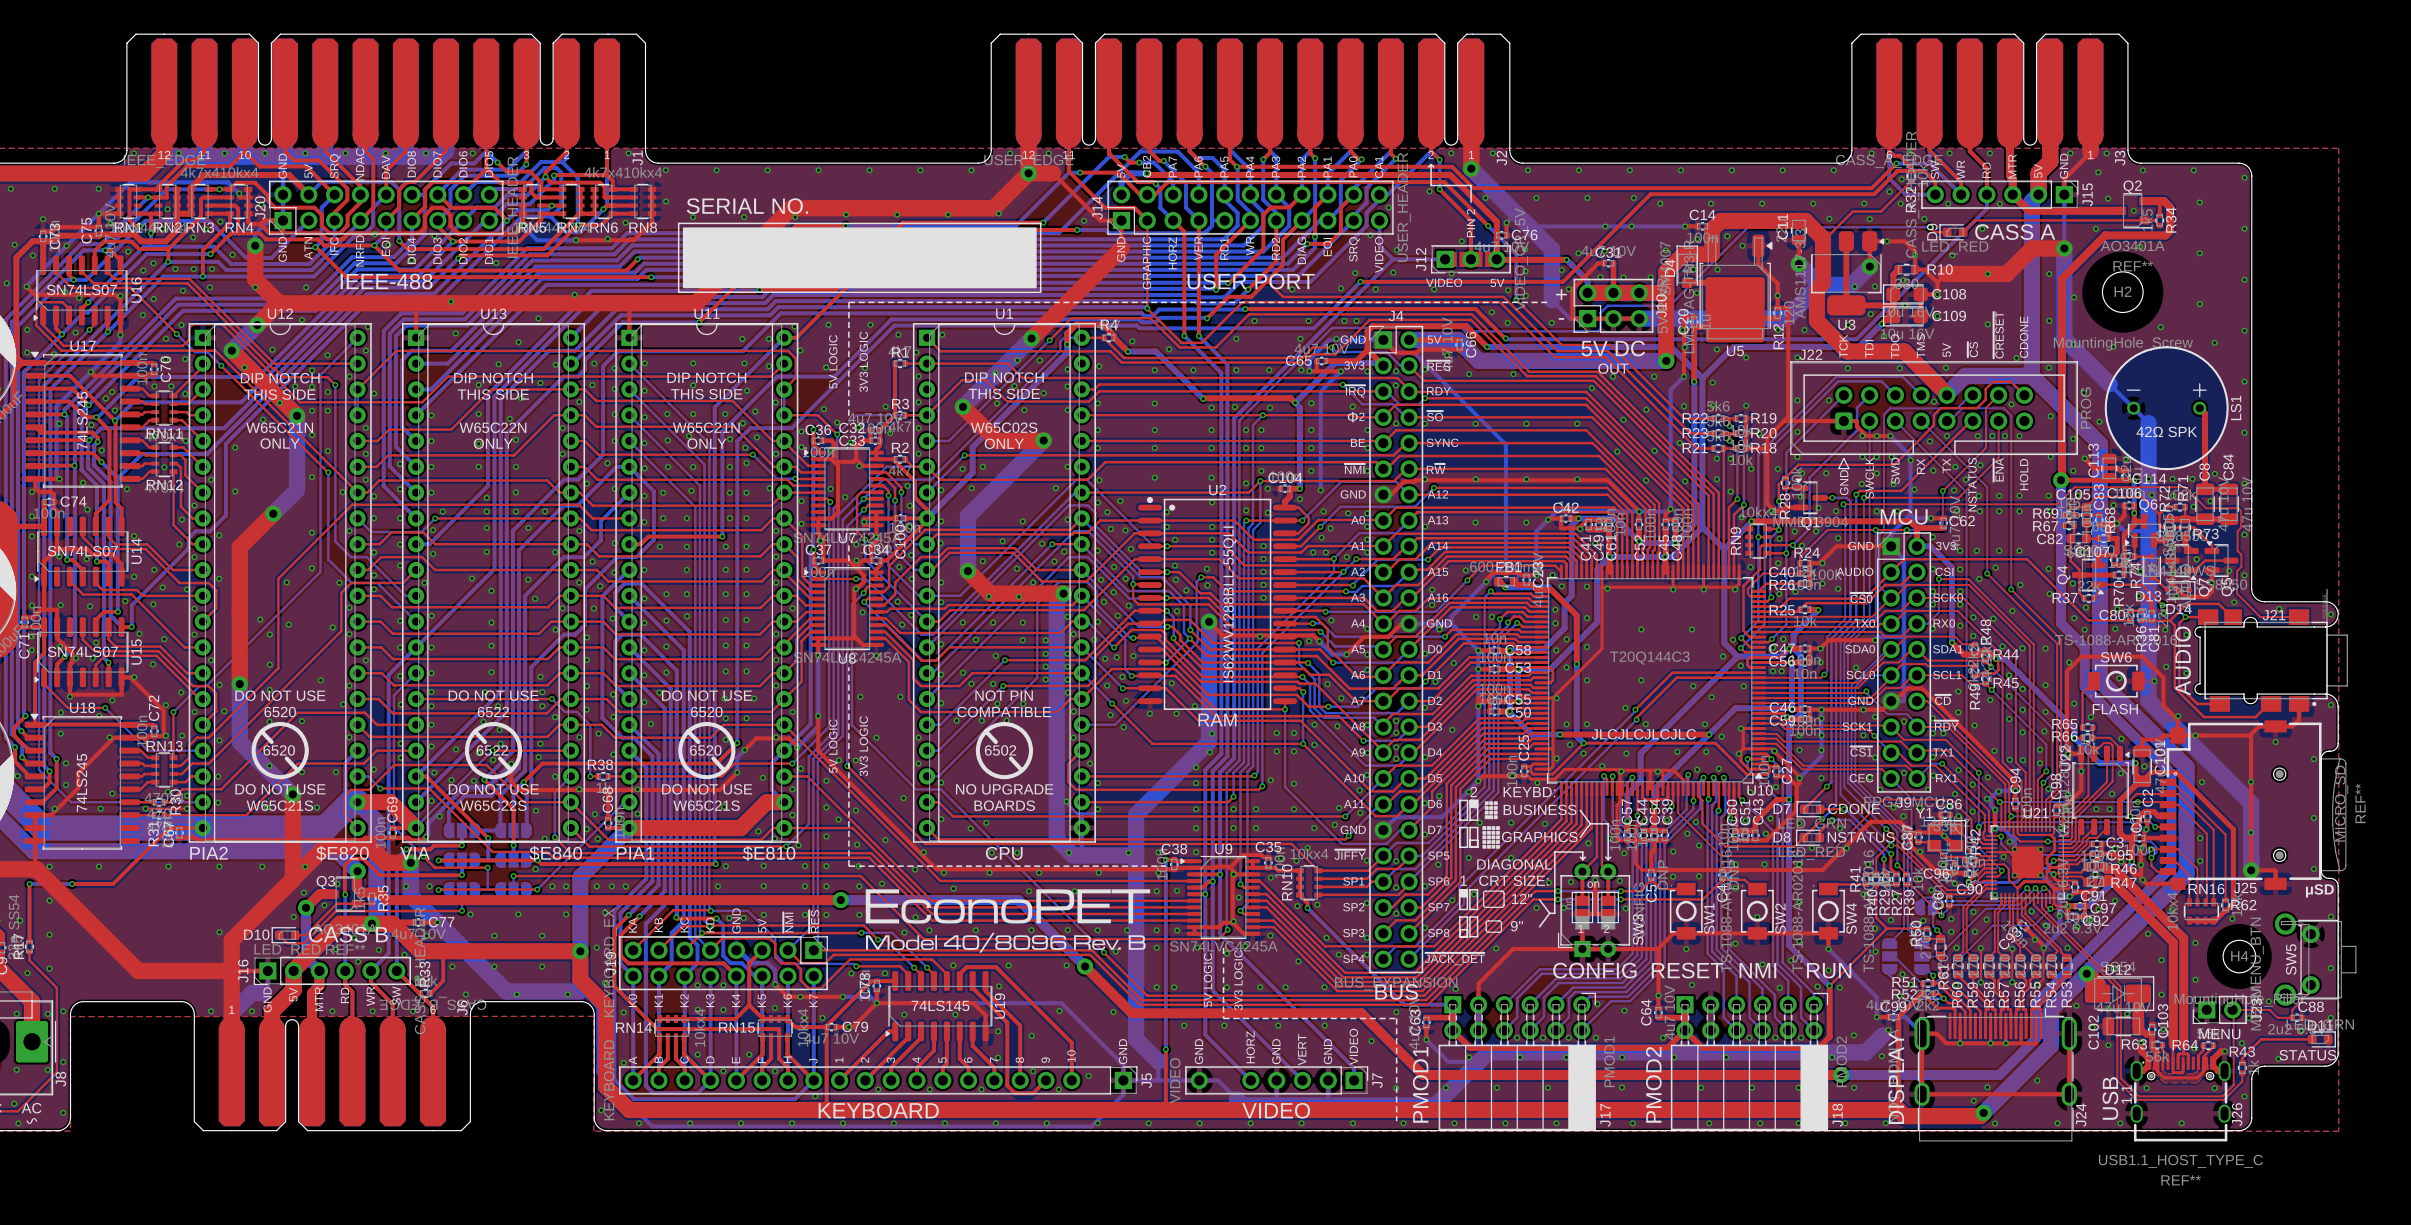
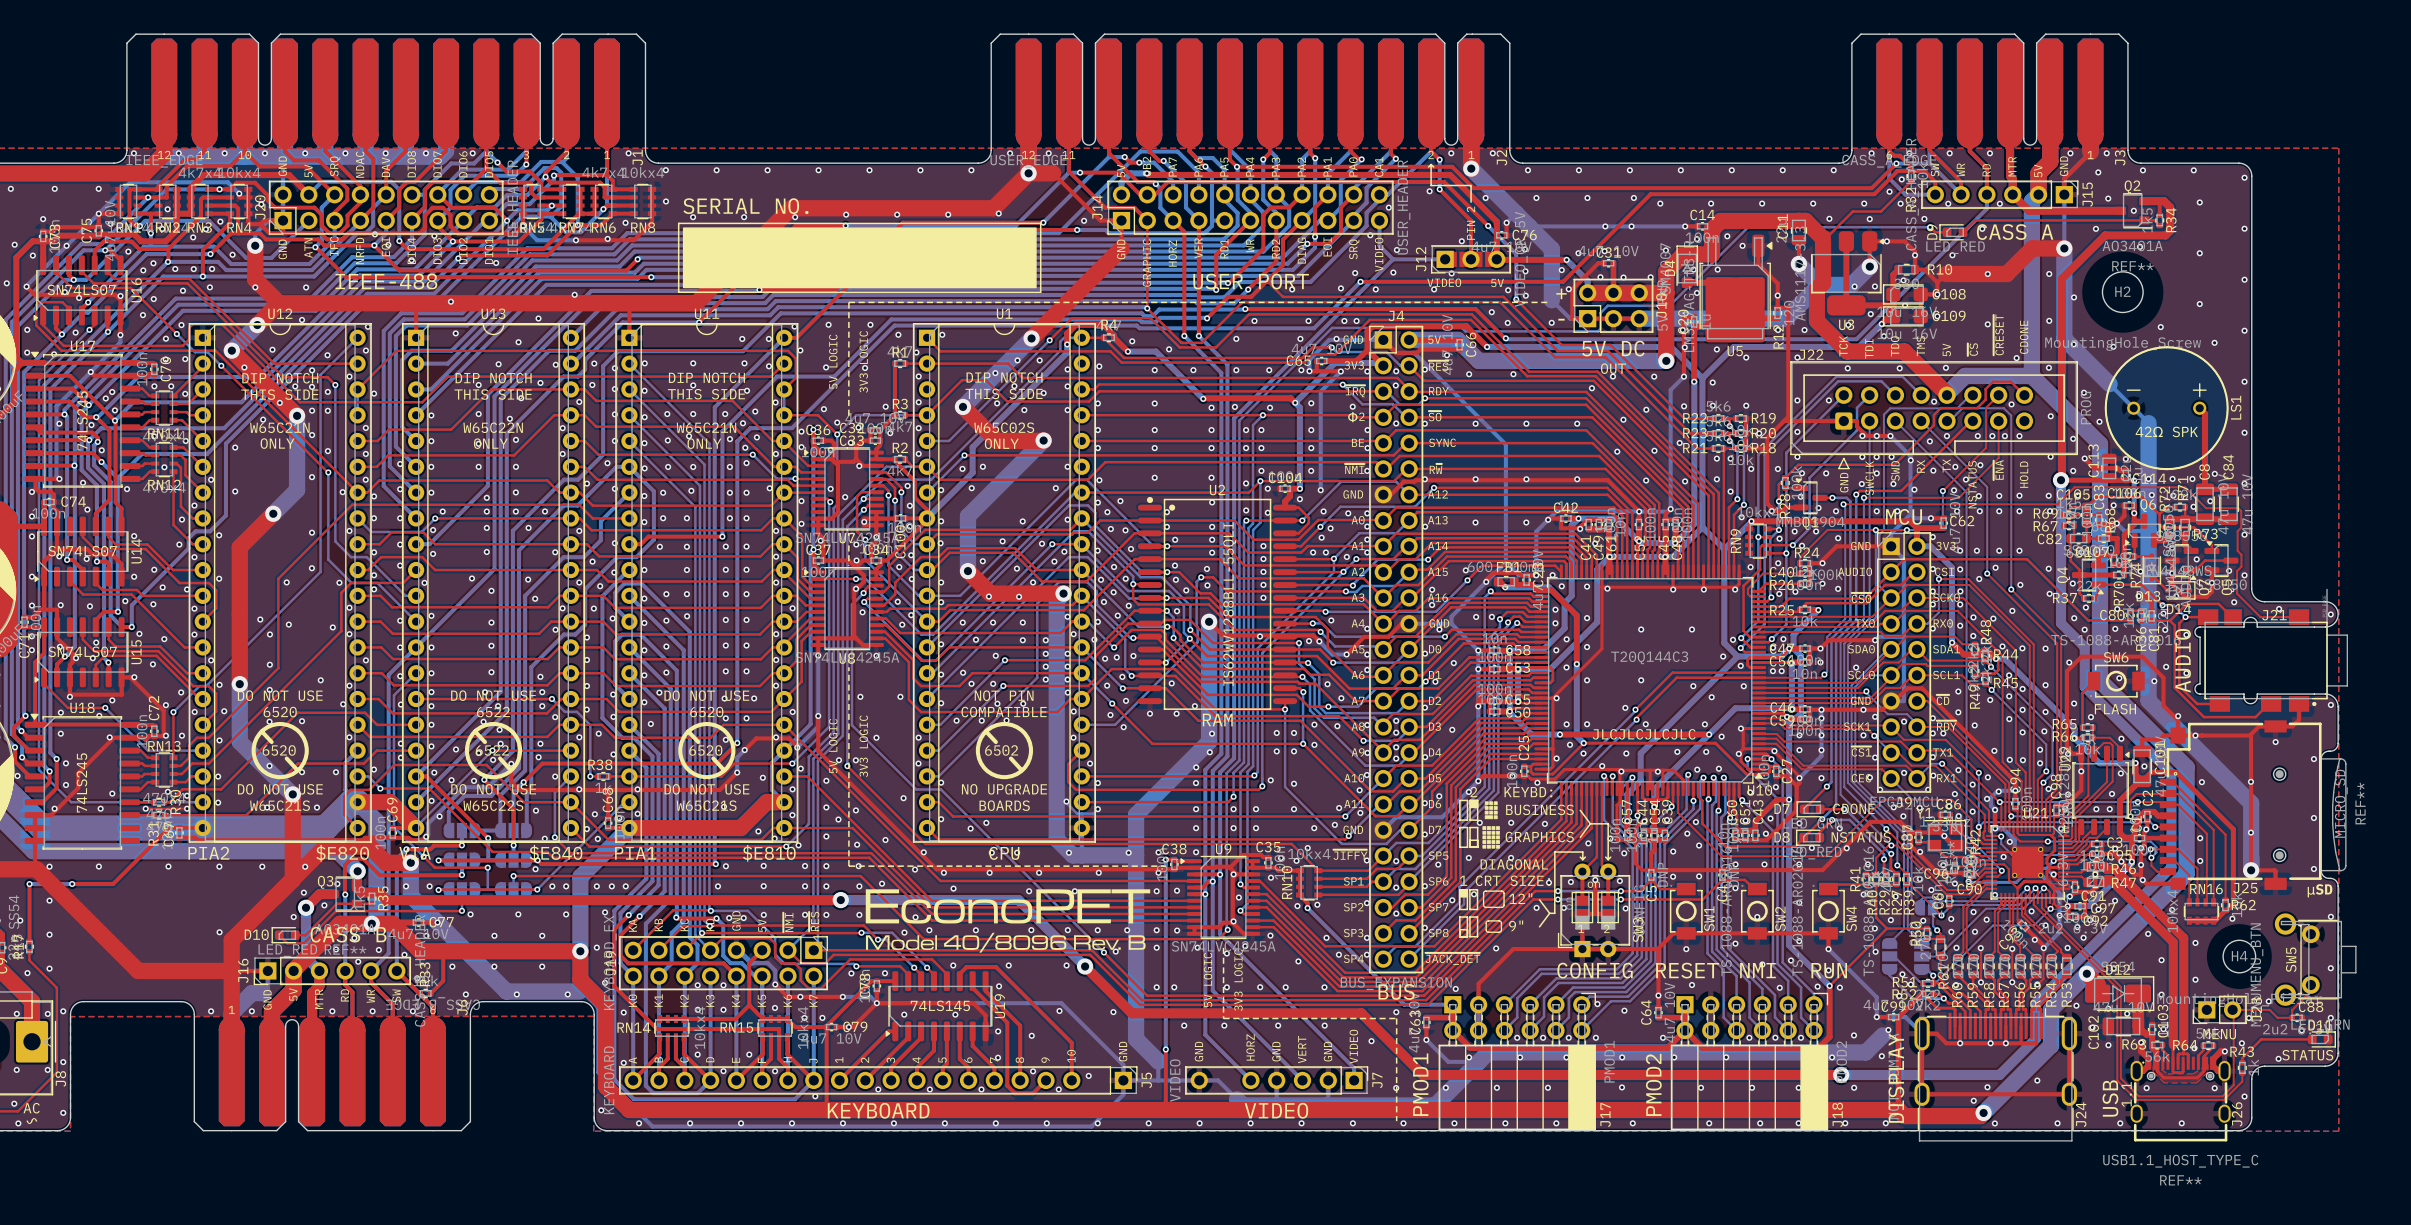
via: none -> (2083, 937)

